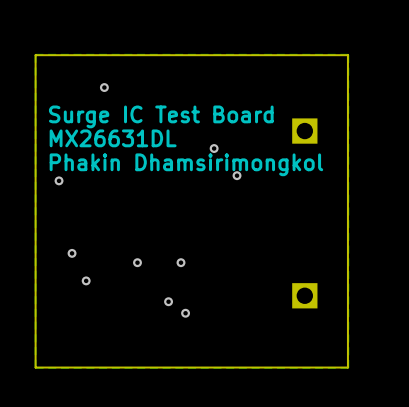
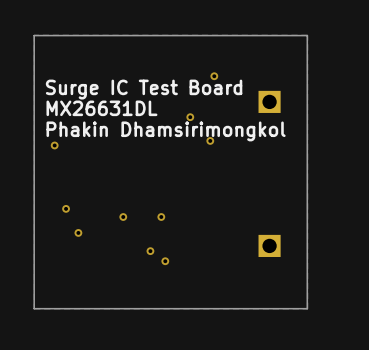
via: (104, 87) -> none
via: none -> (214, 76)

